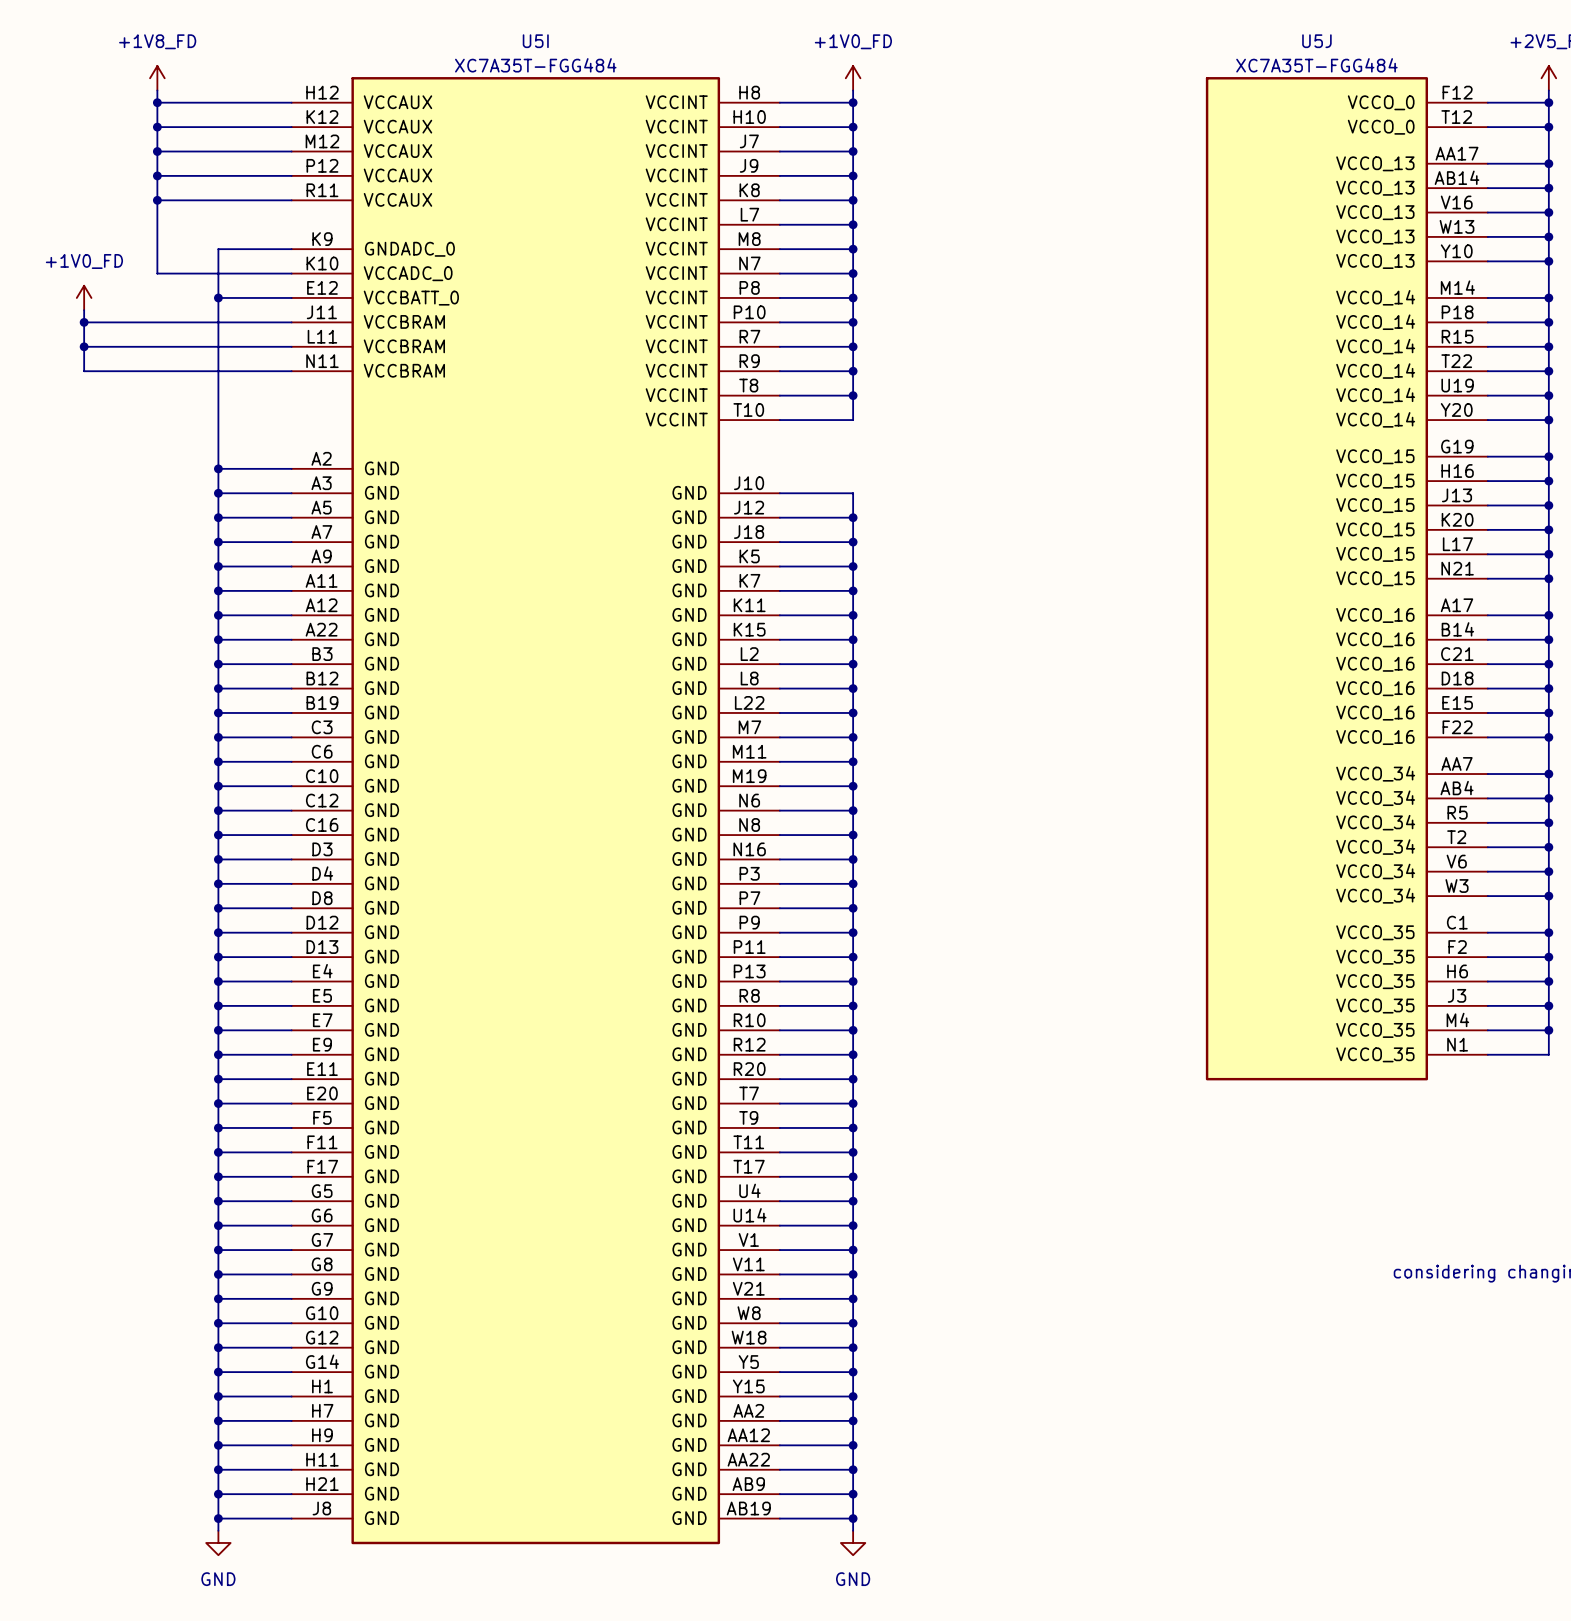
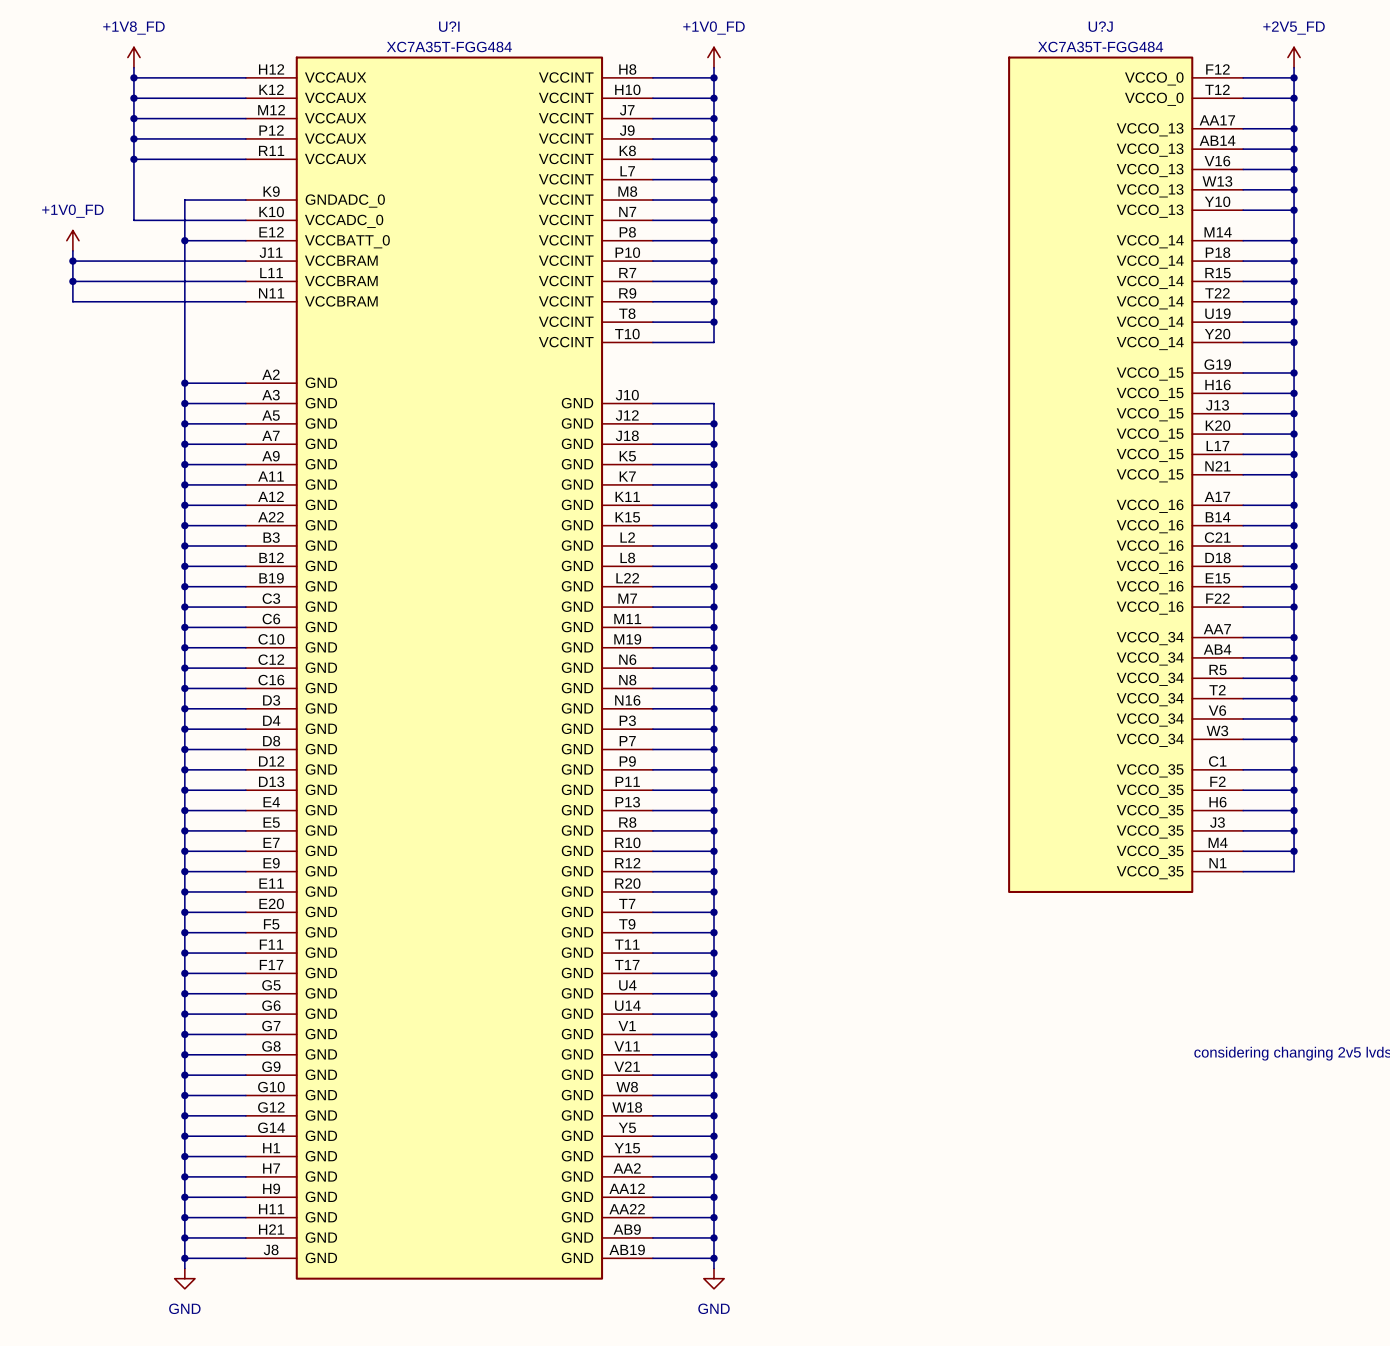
U5I name: U5I (535, 41) -> U?I (449, 26)
U5J name: U5J (1316, 41) -> U?J (1100, 26)

